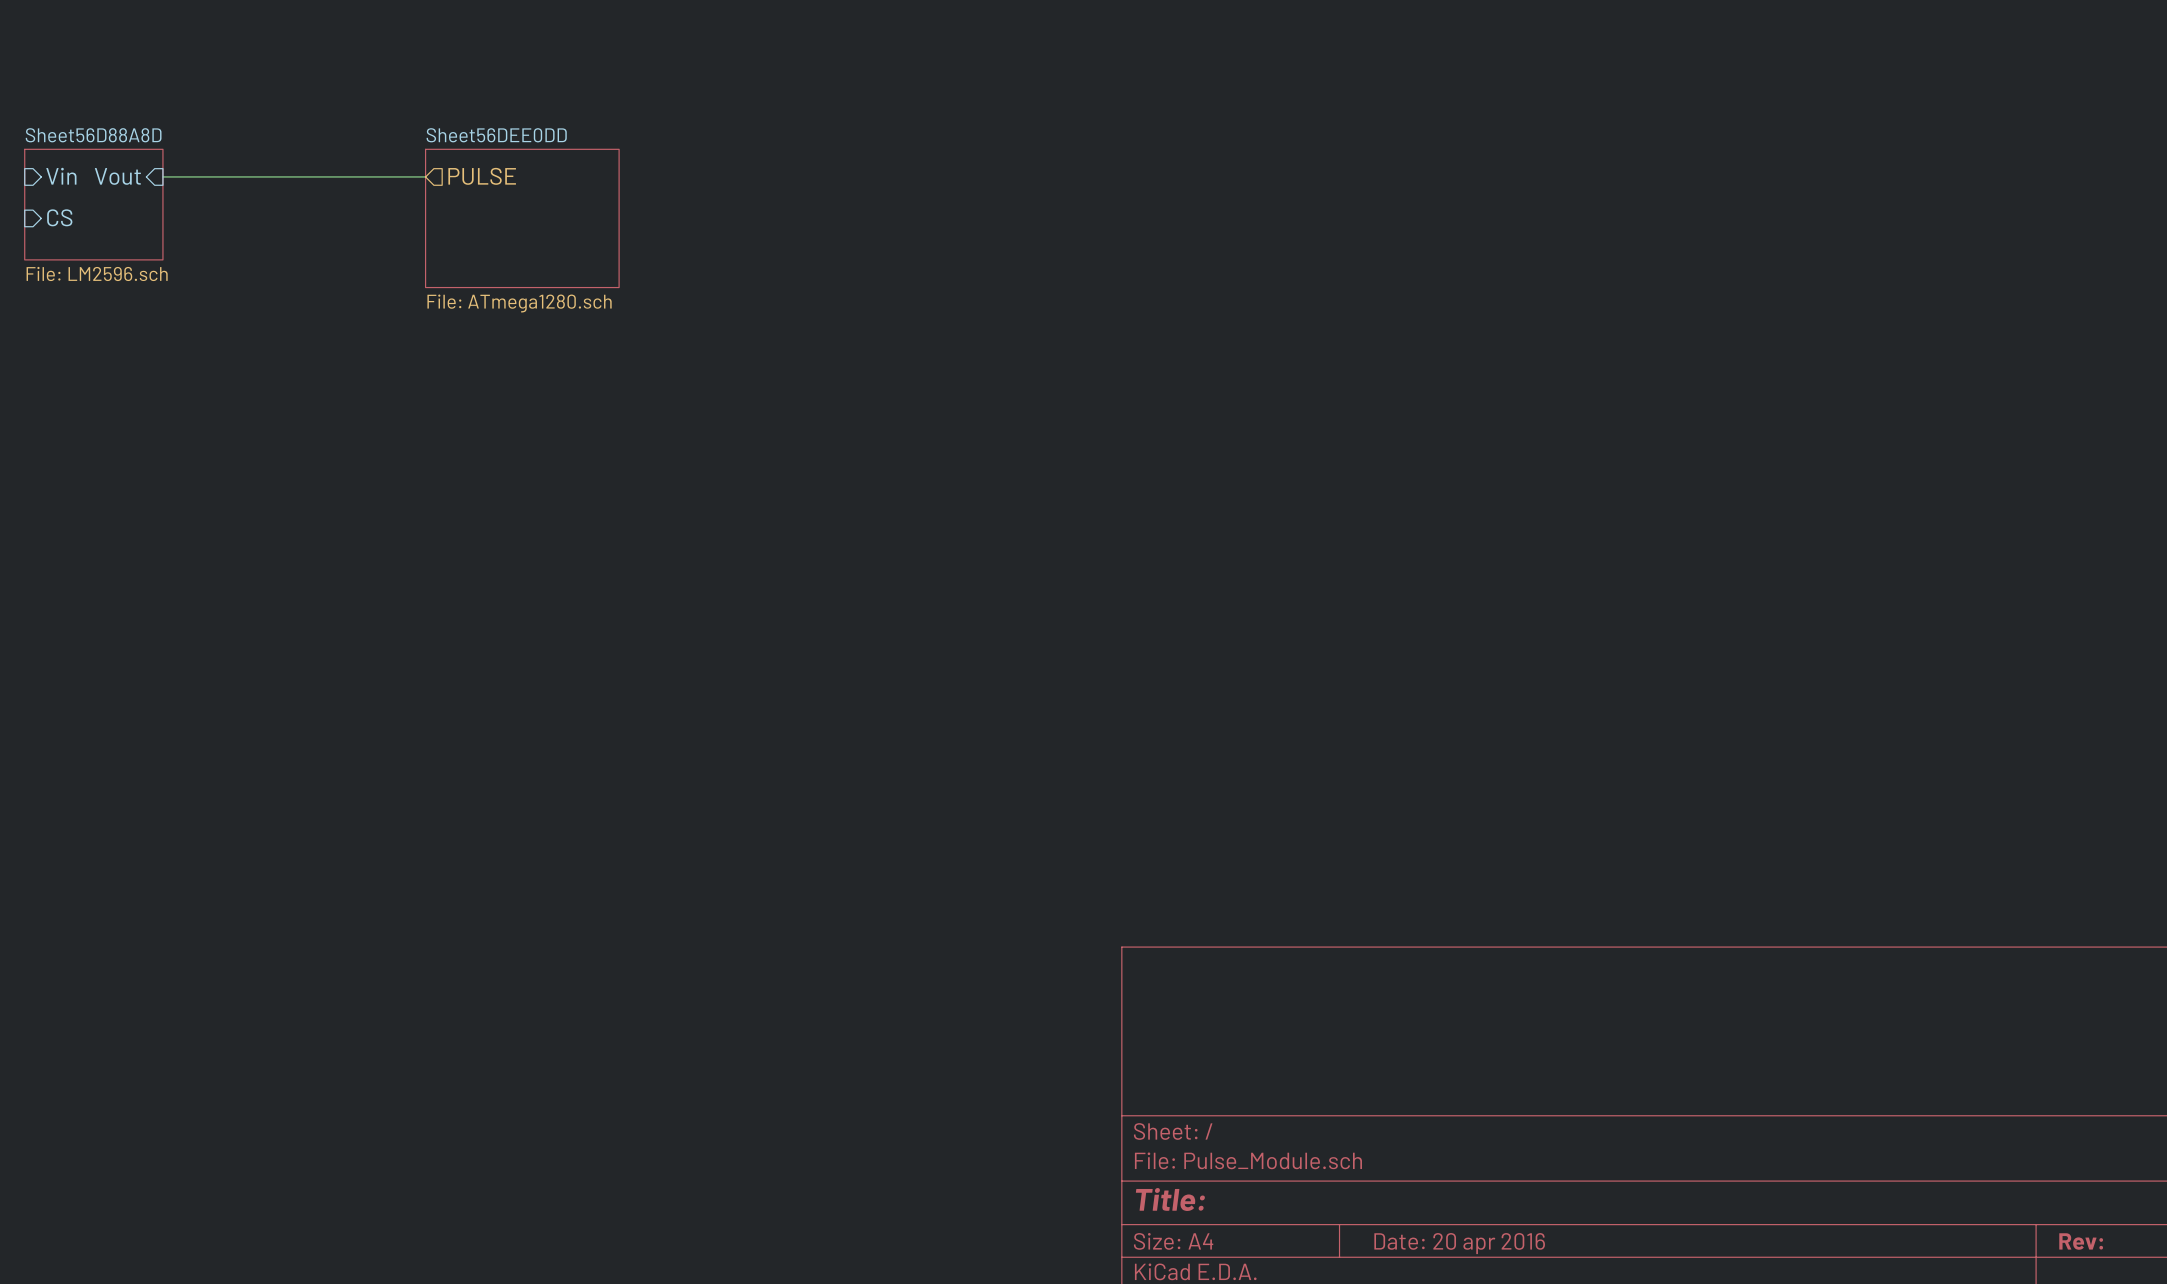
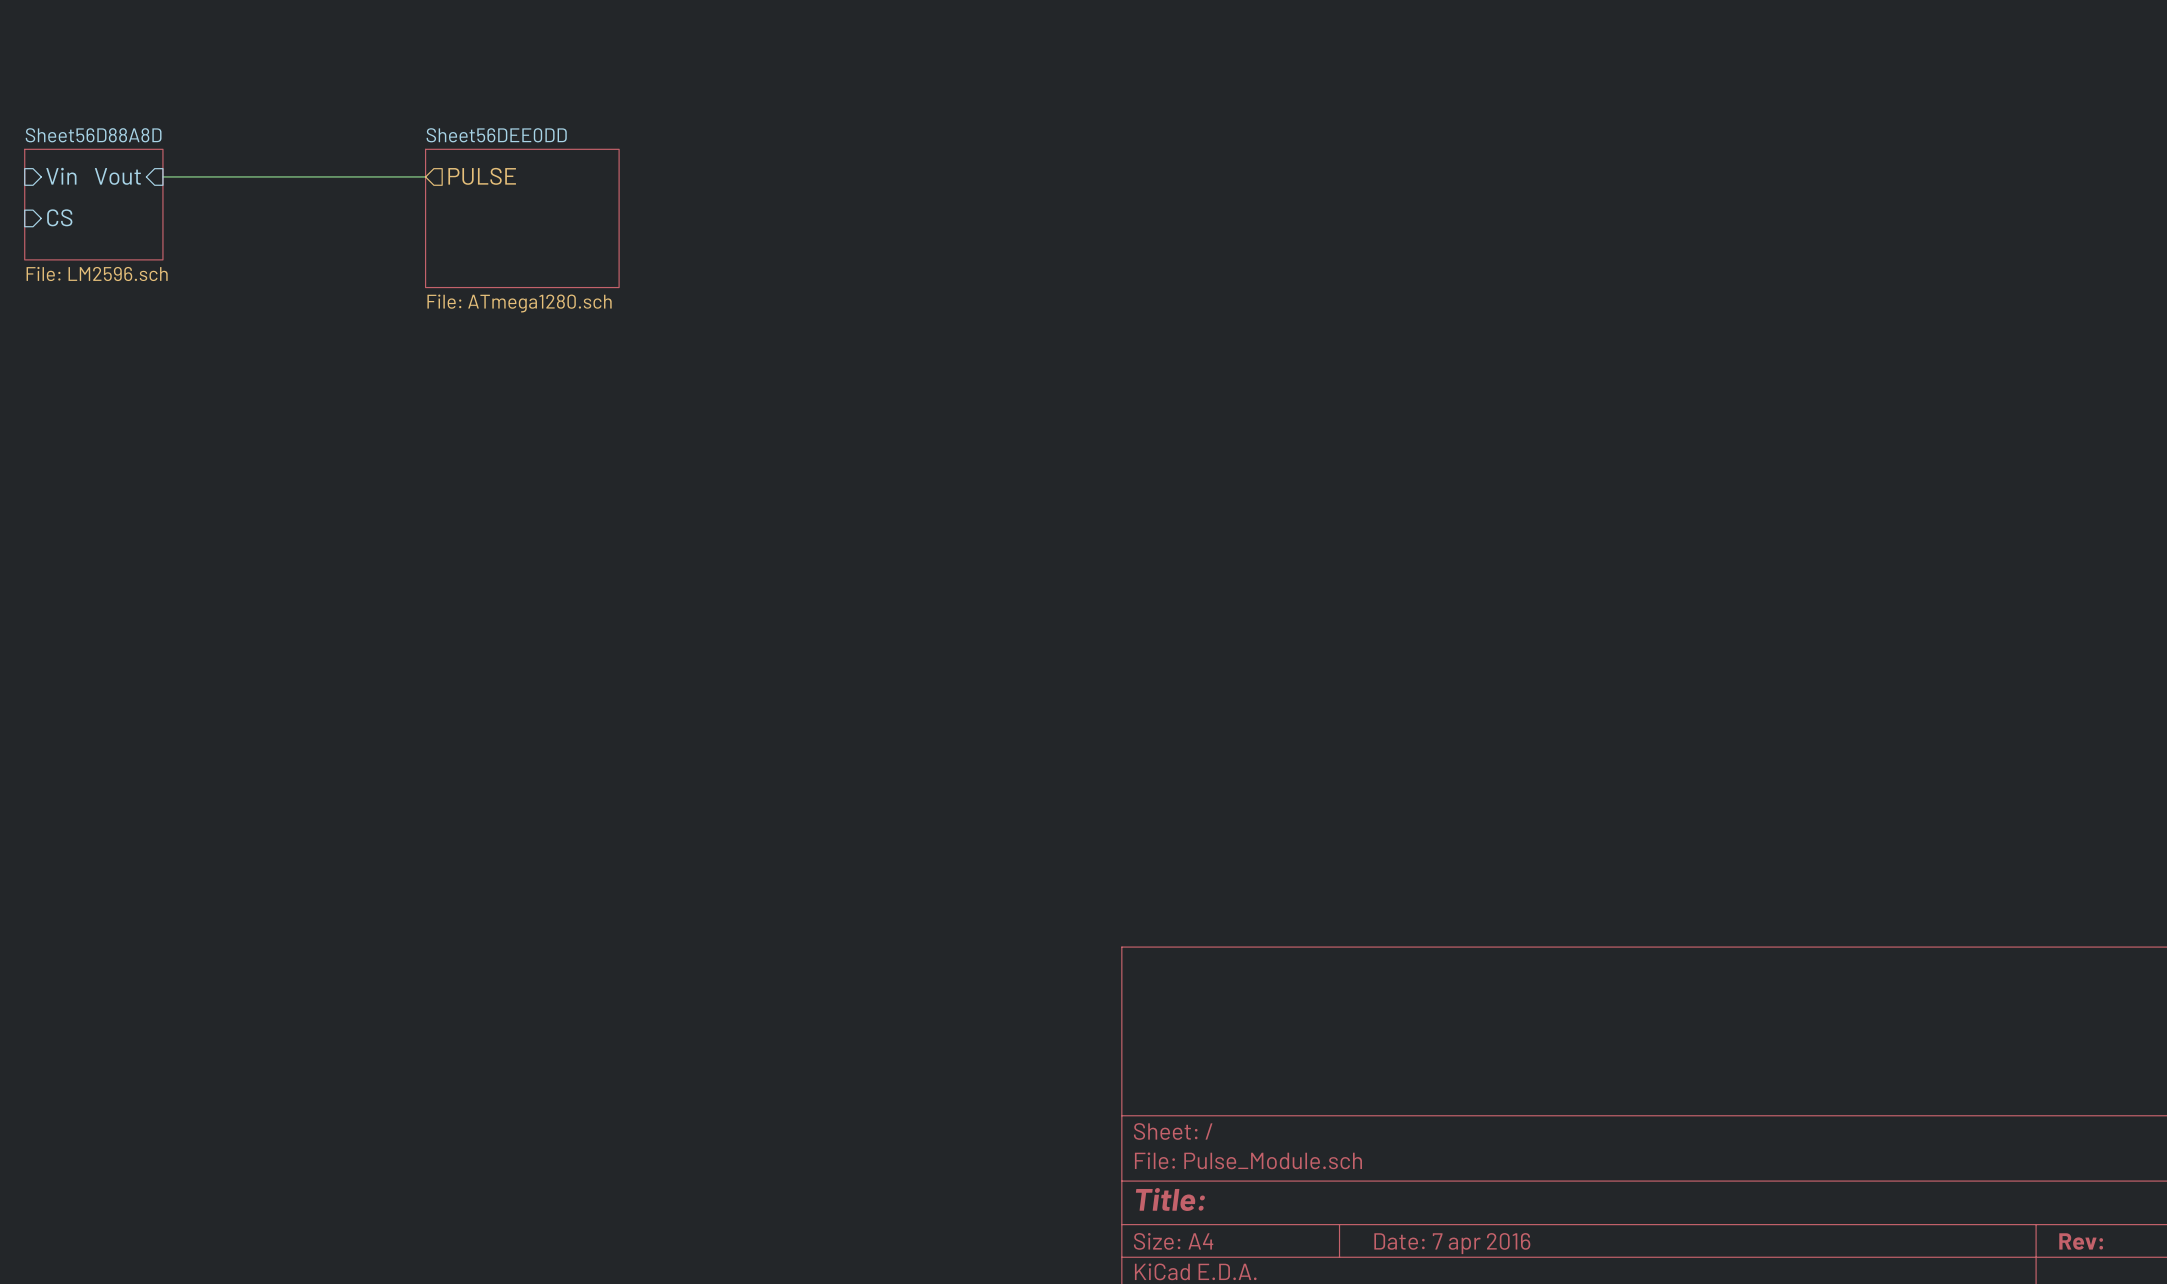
title block: Date: 20 apr 2016 (1459, 1243) -> Date: 7 apr 2016 (1452, 1243)

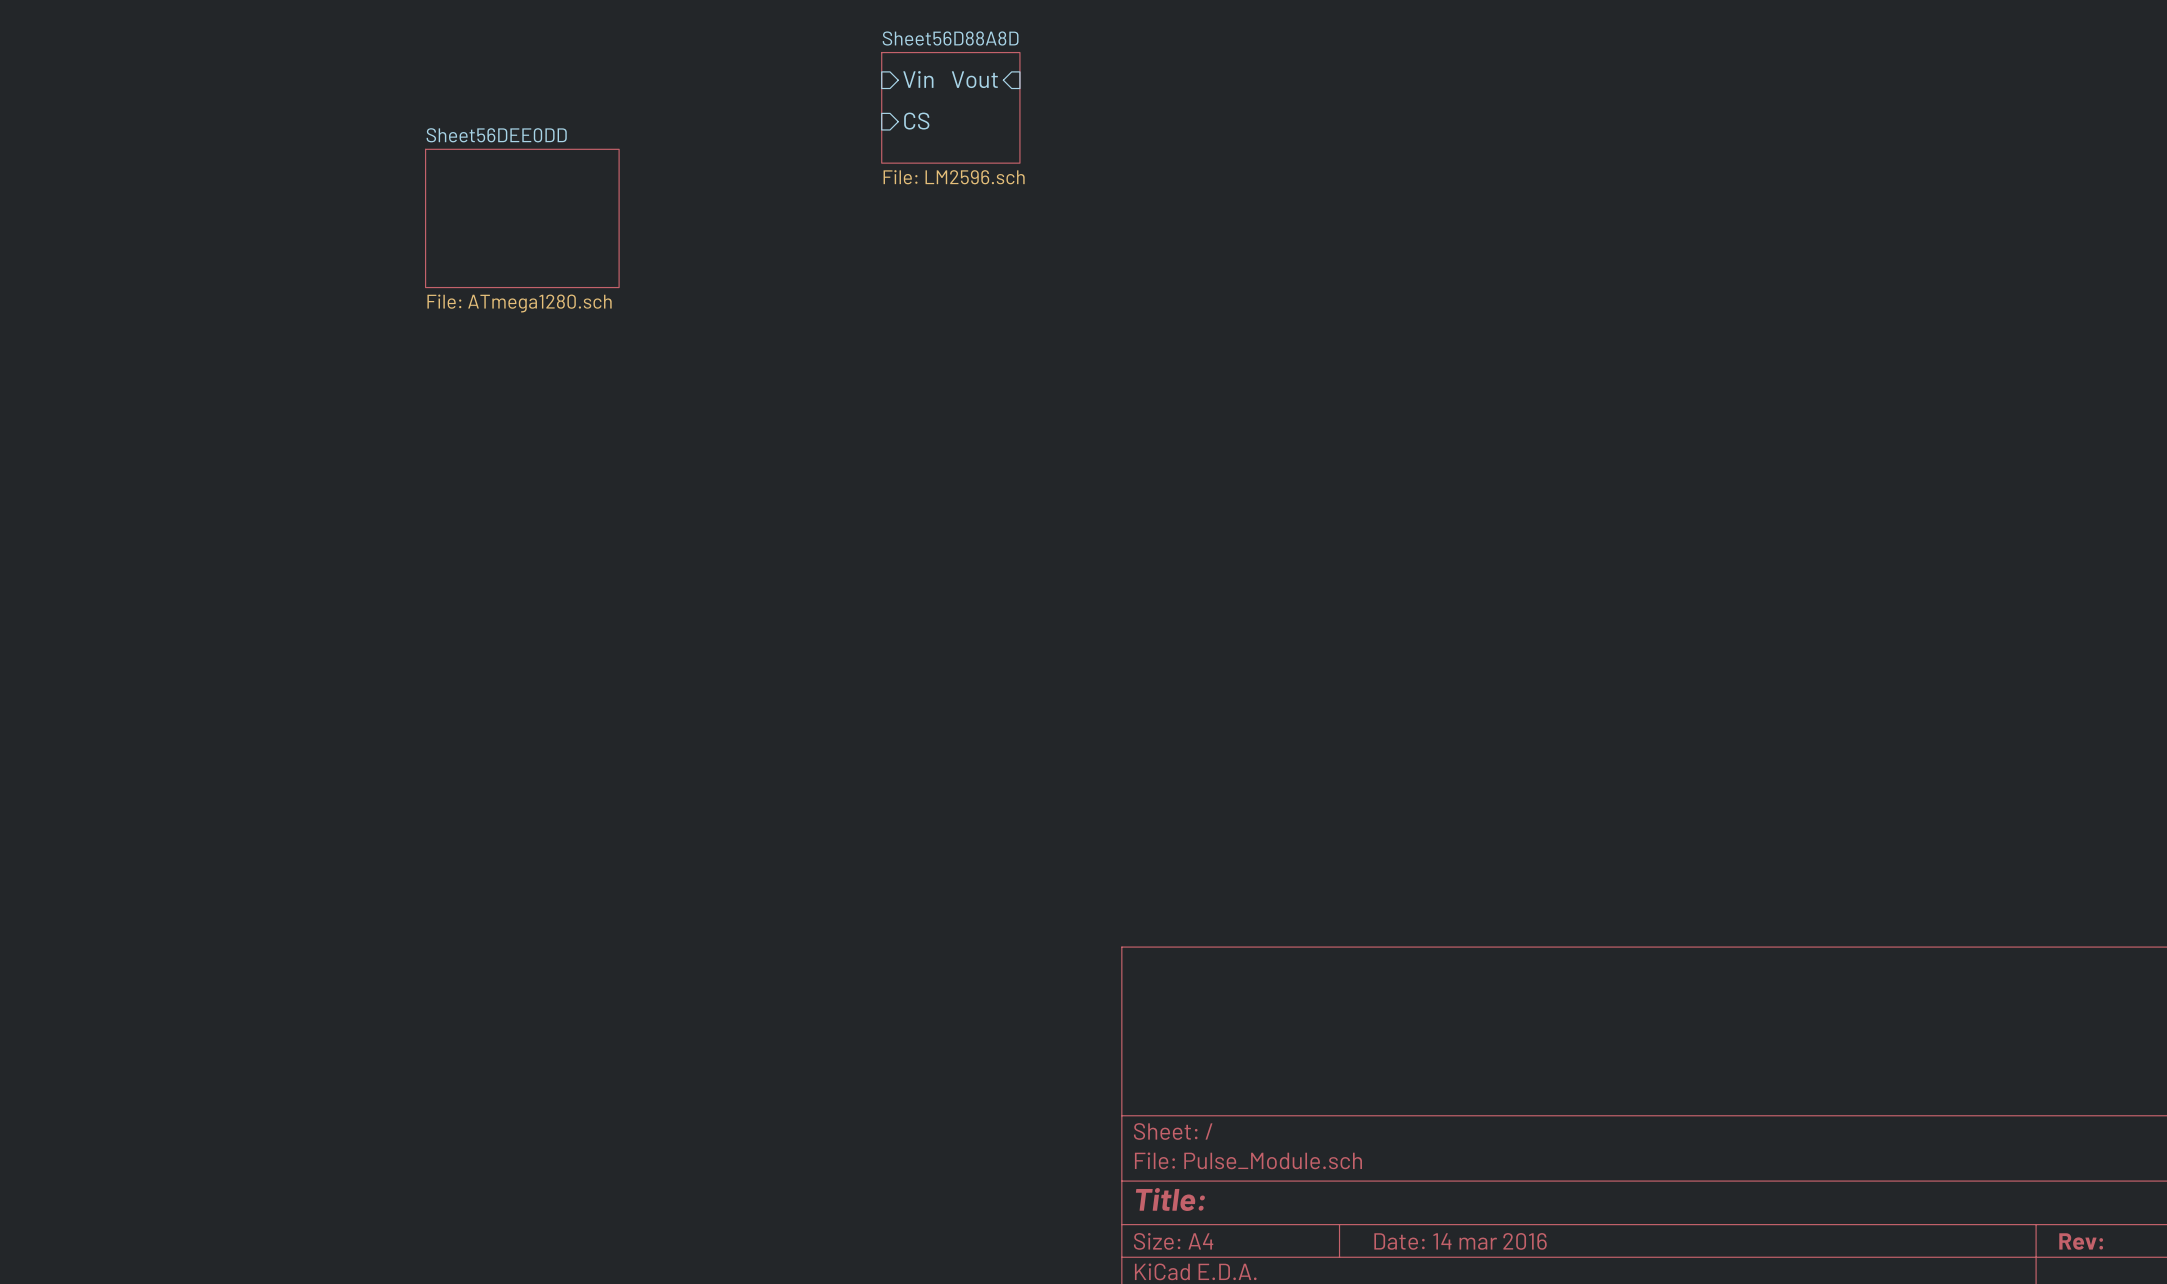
sheet pin: none -> Vin (918, 79)
sheet pin: none -> Vout (974, 79)
sheet pin: none -> CS (916, 121)
sheet pin: Vin (61, 176) -> none
sheet pin: Vout (117, 176) -> none
wire: (162, 176) (425, 176) -> none
hierarchical label: PULSE (482, 176) -> none
sheet Sheet56D88A8D position: (93, 204) -> (950, 107)
sheet pin: CS (59, 217) -> none
title block: Date: 7 apr 2016 (1452, 1243) -> Date: 14 mar 2016 (1460, 1241)

